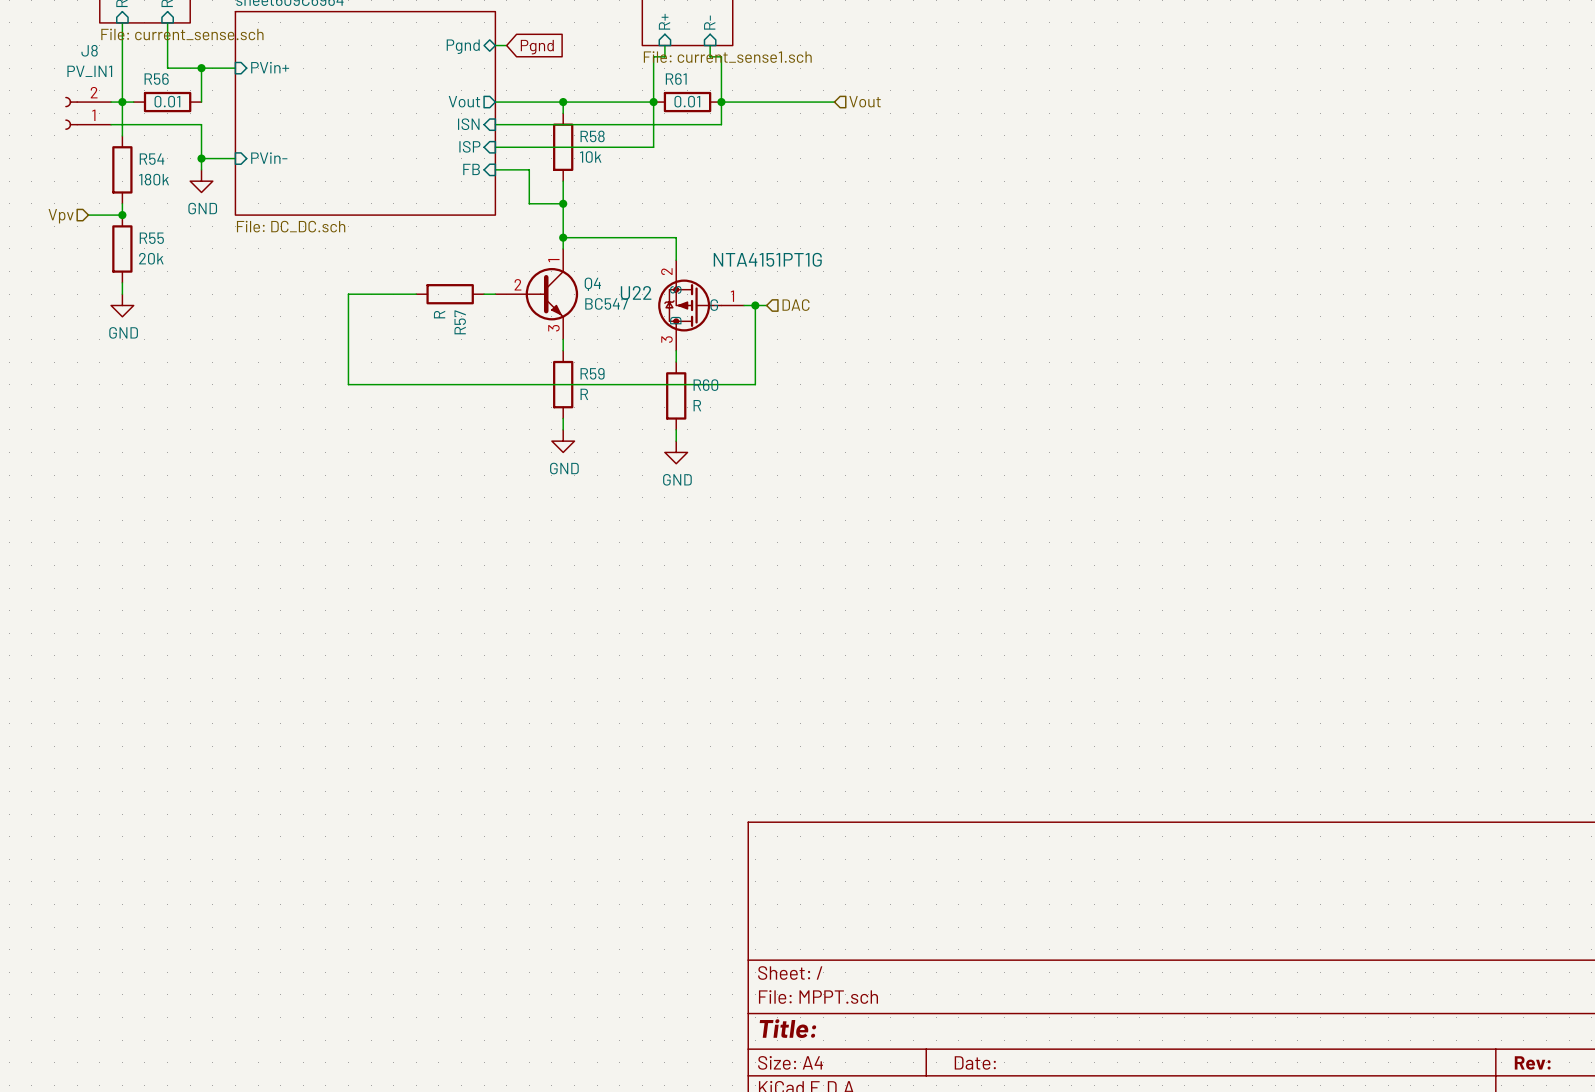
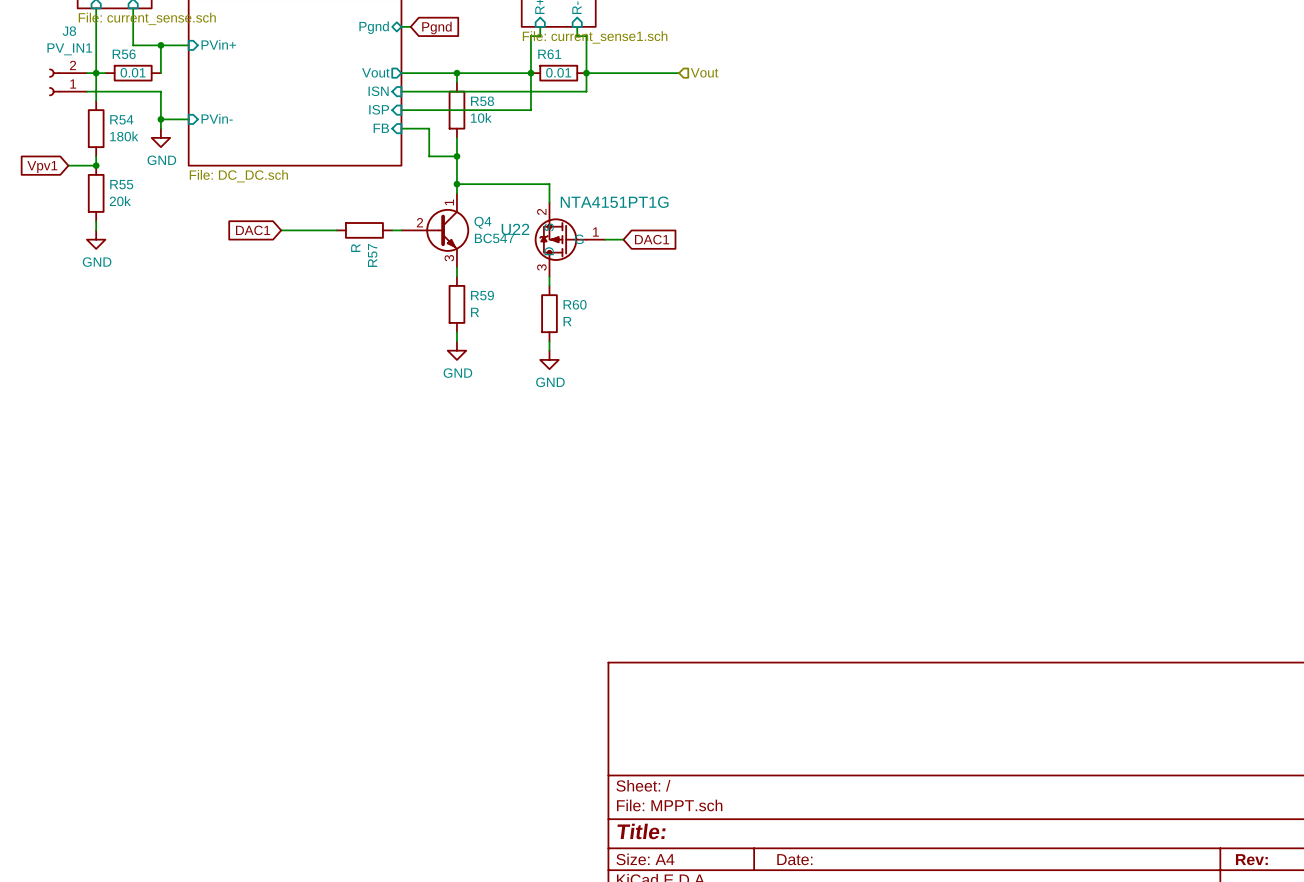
global label: none -> Vpv1 (42, 167)
hierarchical label: Vpv (61, 216) -> none
global label: none -> DAC1 (253, 230)
wire: (348, 294) (348, 384) (755, 384) (755, 305) -> none
junction: (755, 305) -> none
hierarchical label: DAC (796, 305) -> none
global label: none -> DAC1 (652, 239)

